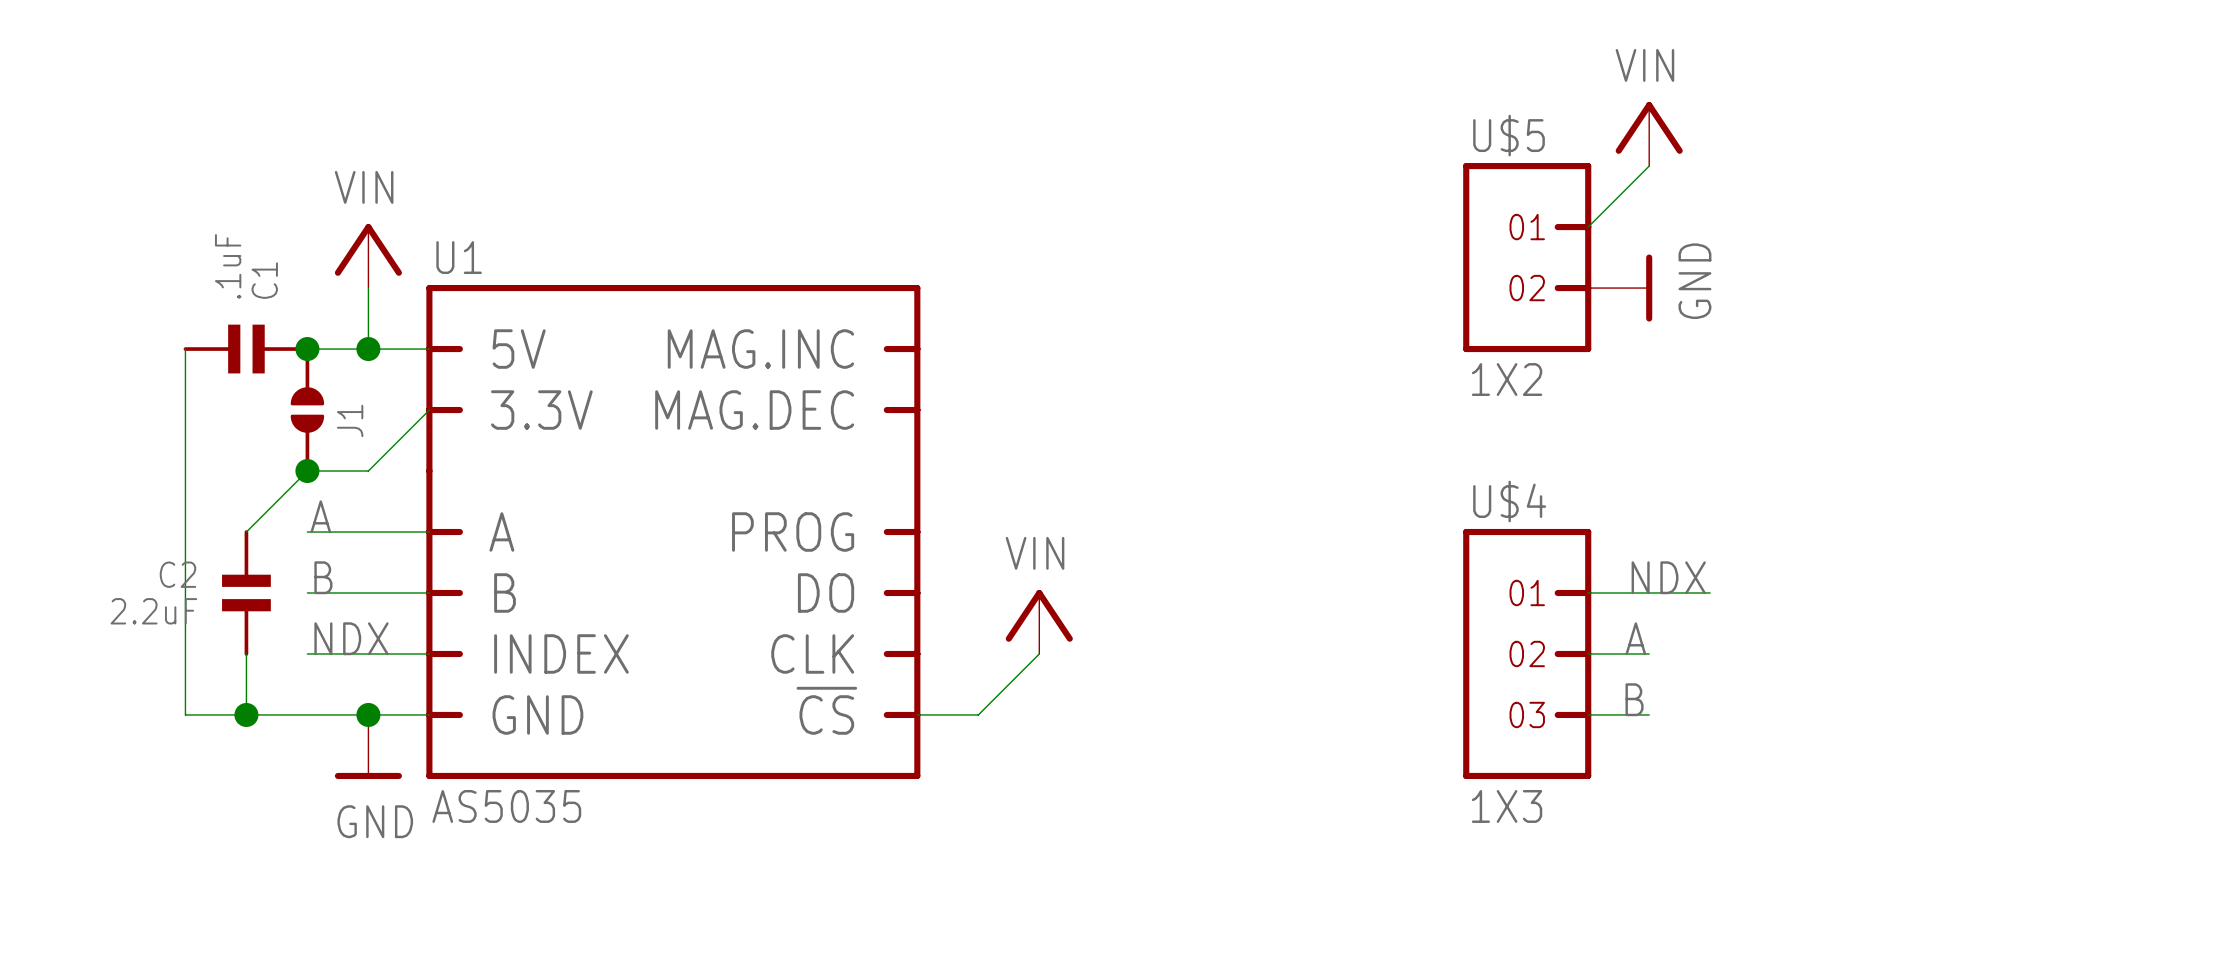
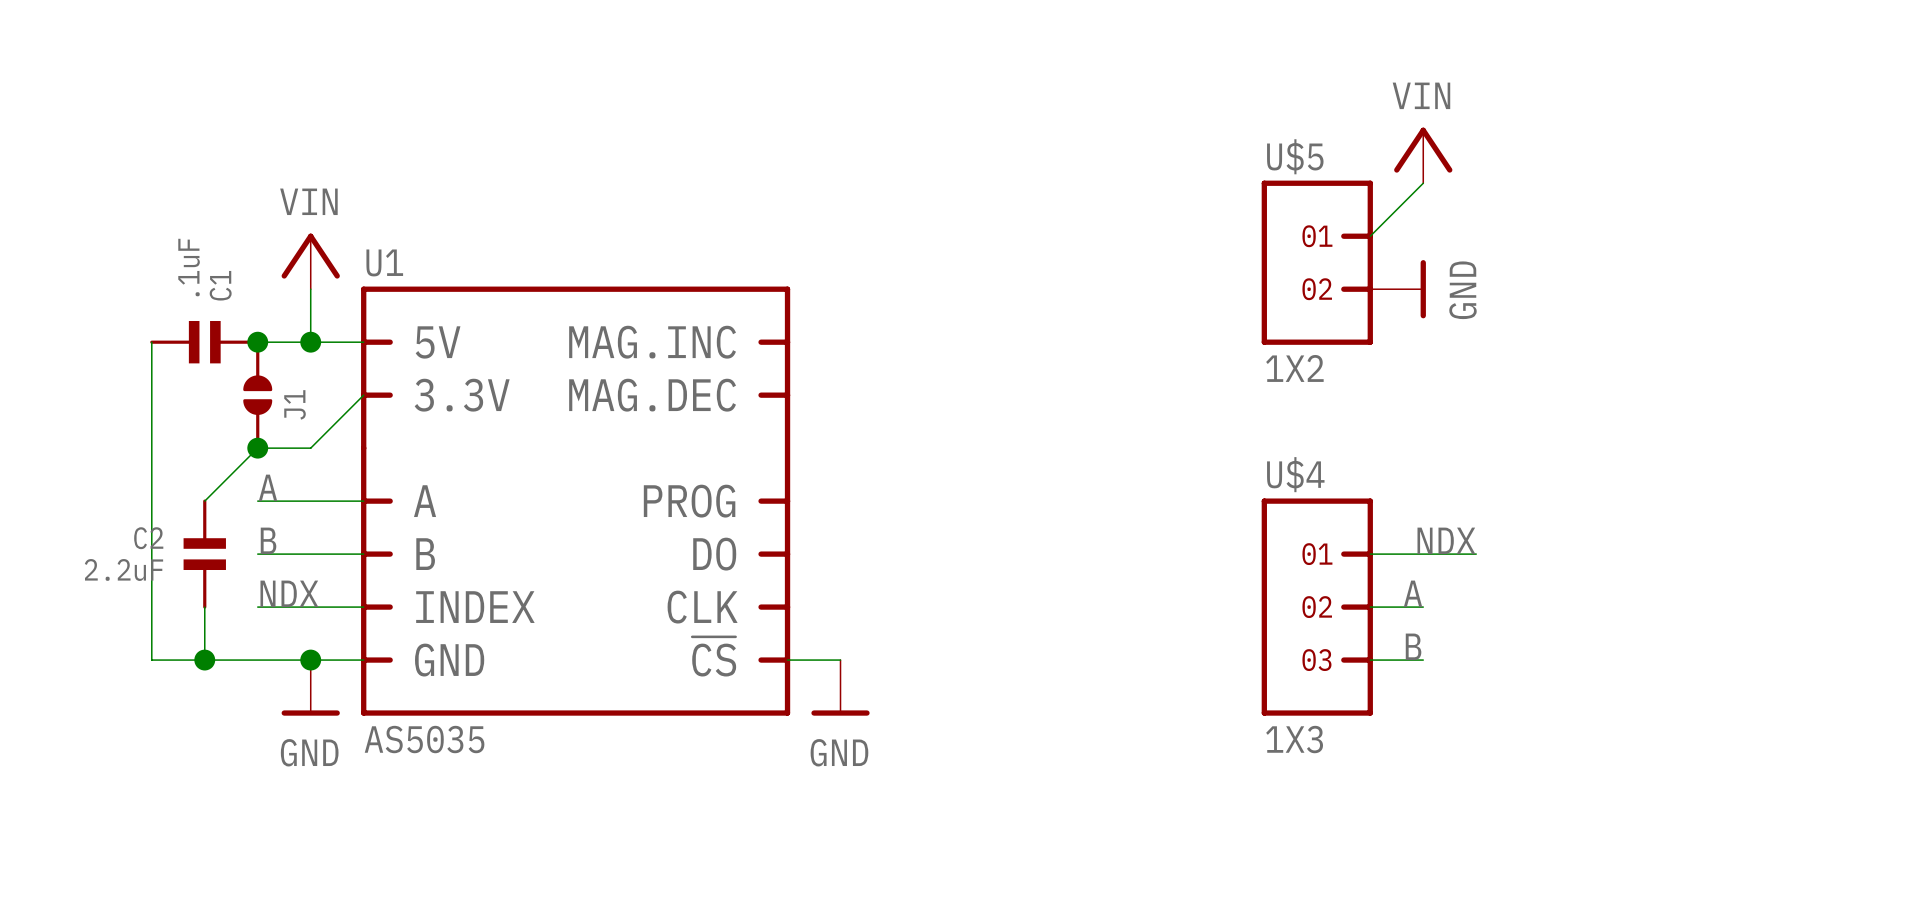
power symbol: VIN (1039, 621) -> none
wire: (1039, 653) (978, 714) -> none
power symbol: none -> GND (840, 687)

